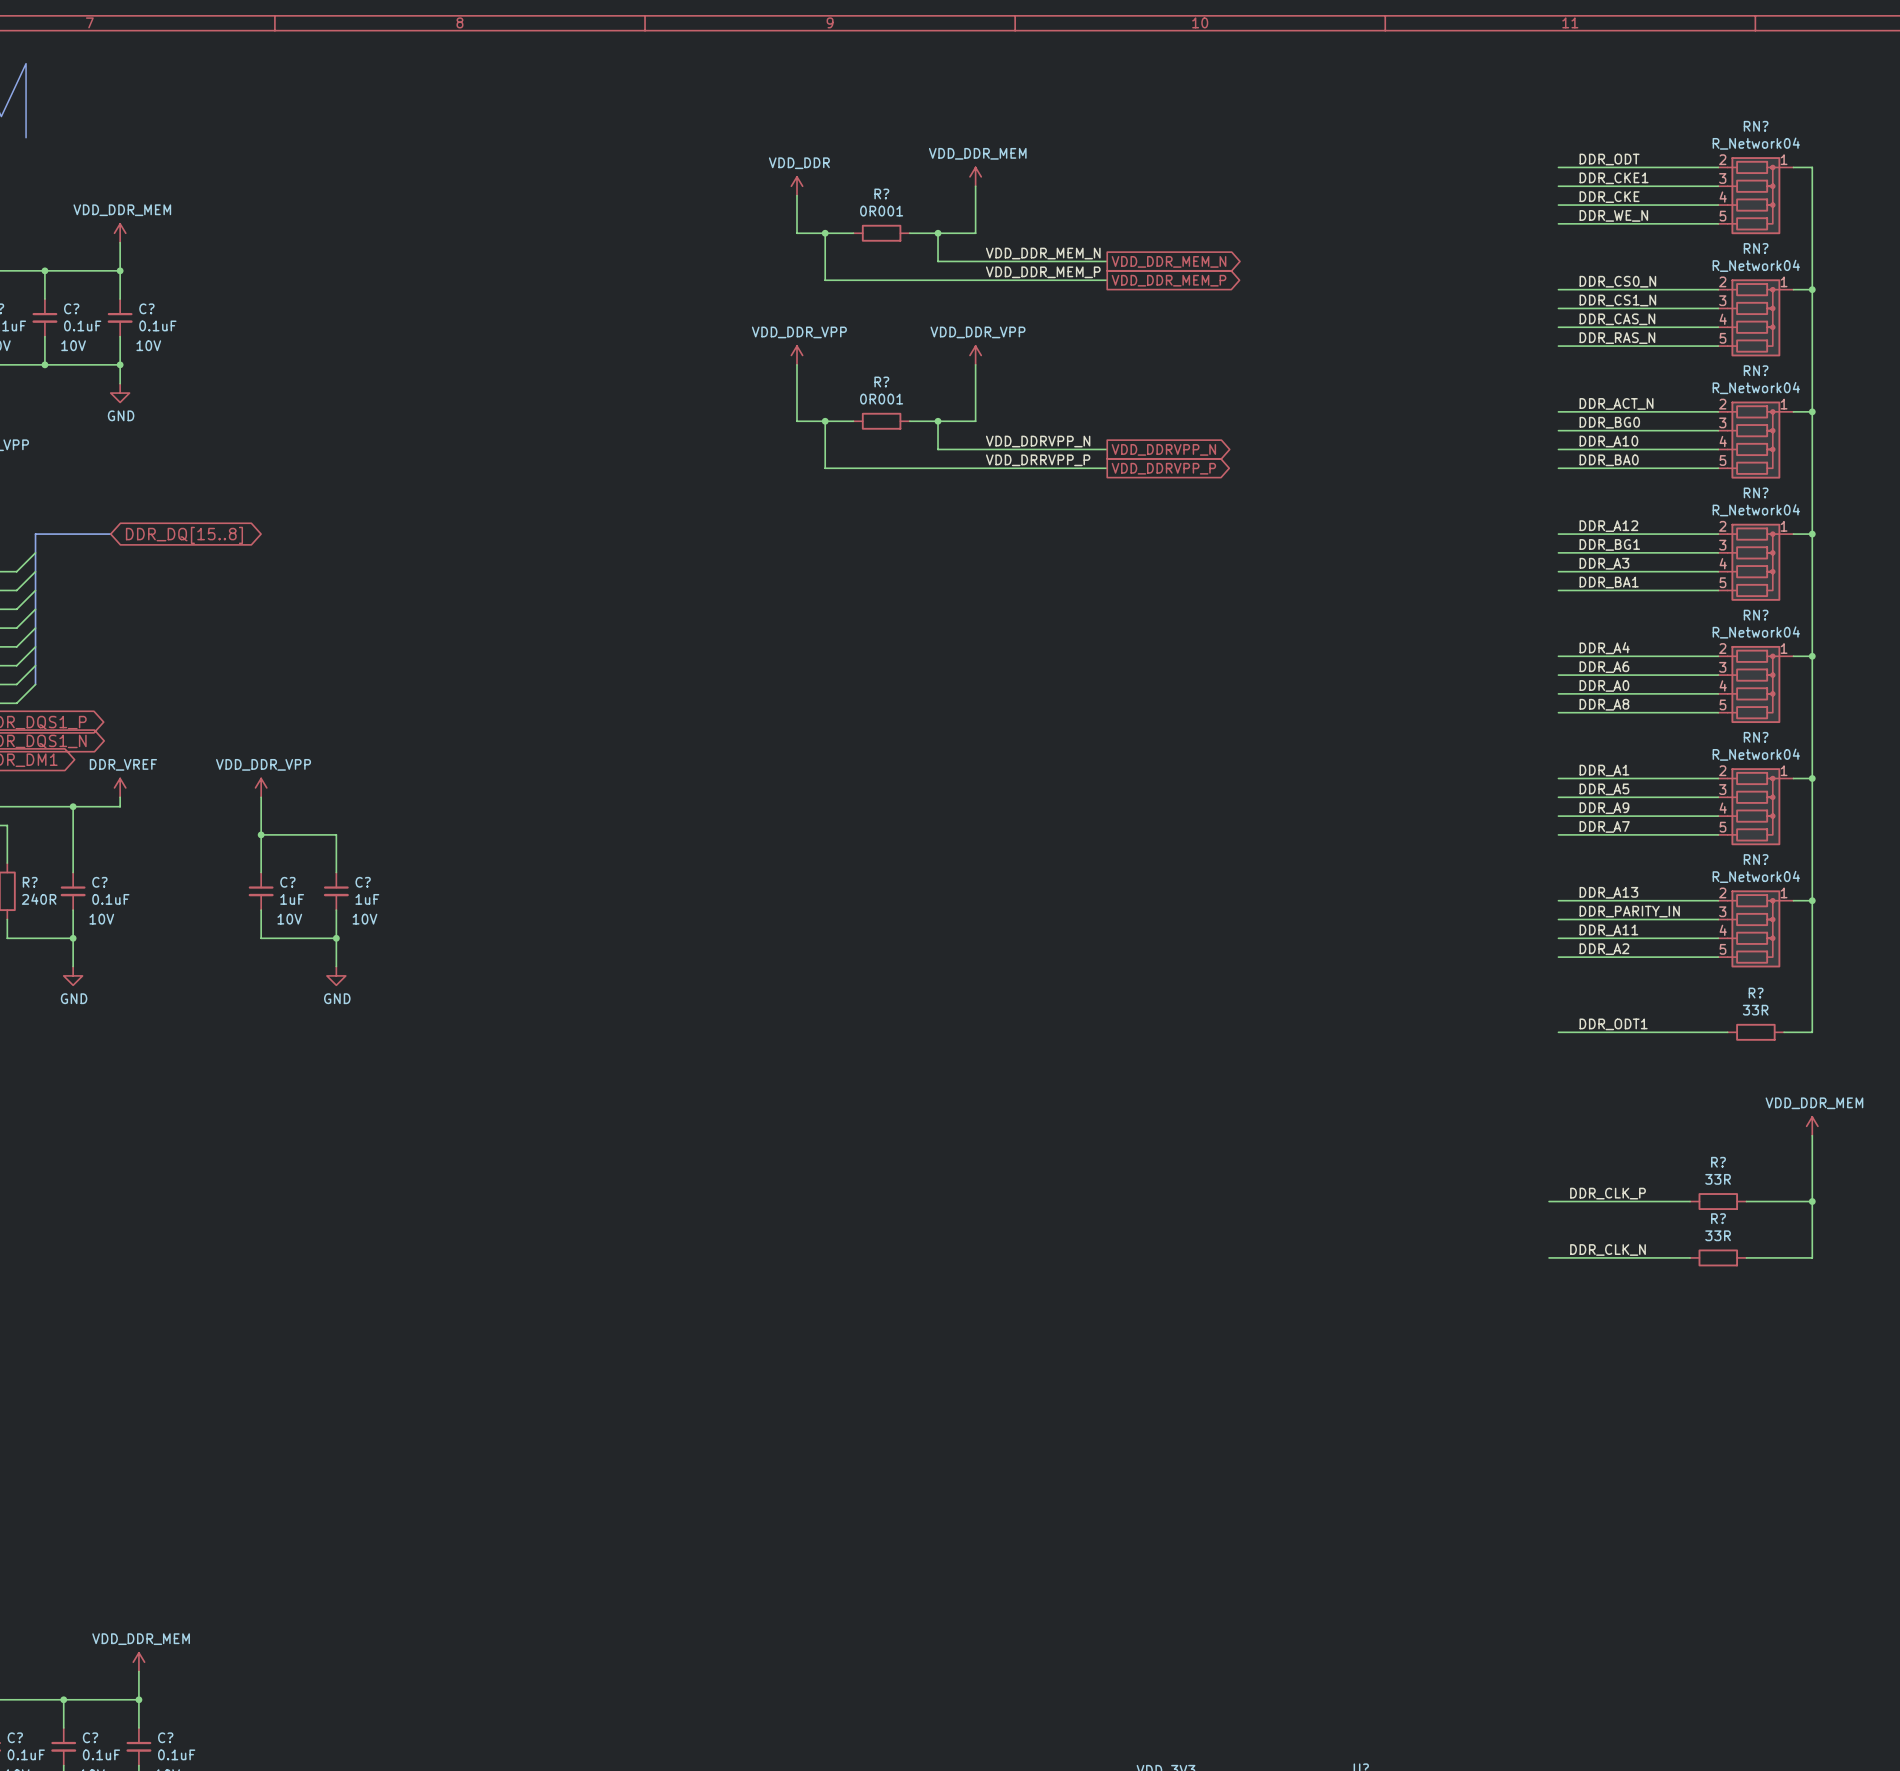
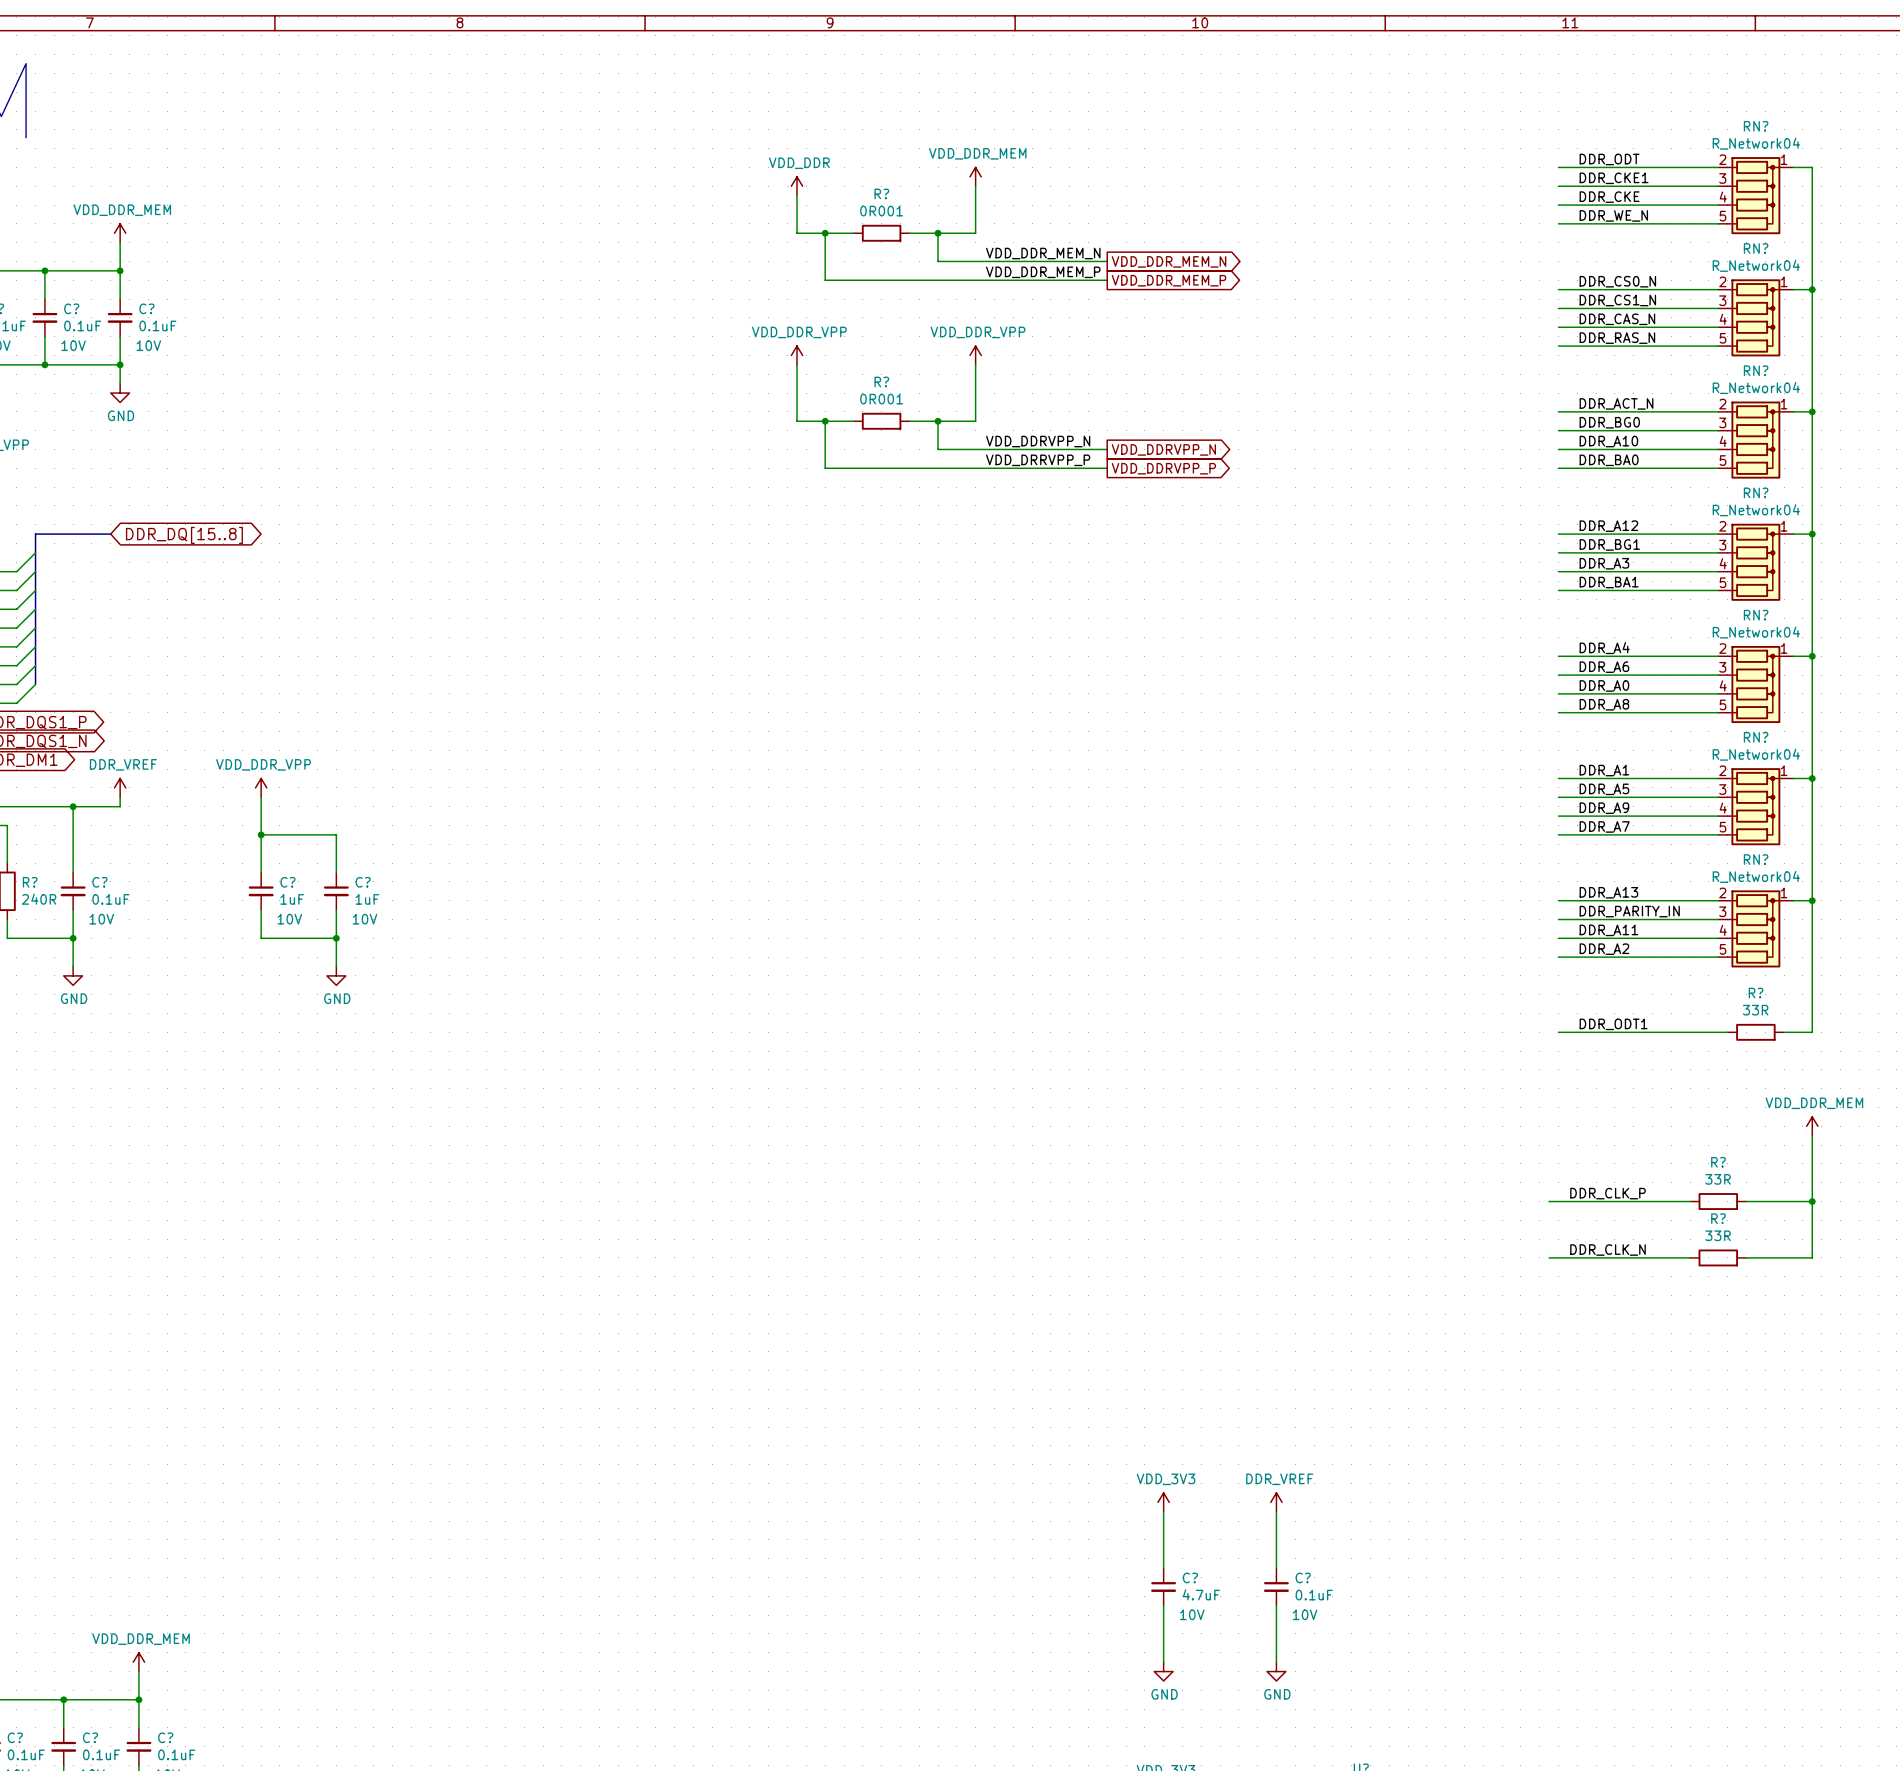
power symbol: none -> VDD_3V3 (1163, 1502)
power symbol: none -> DDR_VREF (1276, 1502)
wire: none -> (1163, 1511) (1163, 1568)
wire: none -> (1276, 1511) (1276, 1568)
C?: none -> 4.7uF (1163, 1586)
C?: none -> 0.1uF (1276, 1586)
wire: none -> (1163, 1605) (1163, 1662)
wire: none -> (1276, 1605) (1276, 1662)
power symbol: none -> GND (1163, 1671)
power symbol: none -> GND (1276, 1671)

